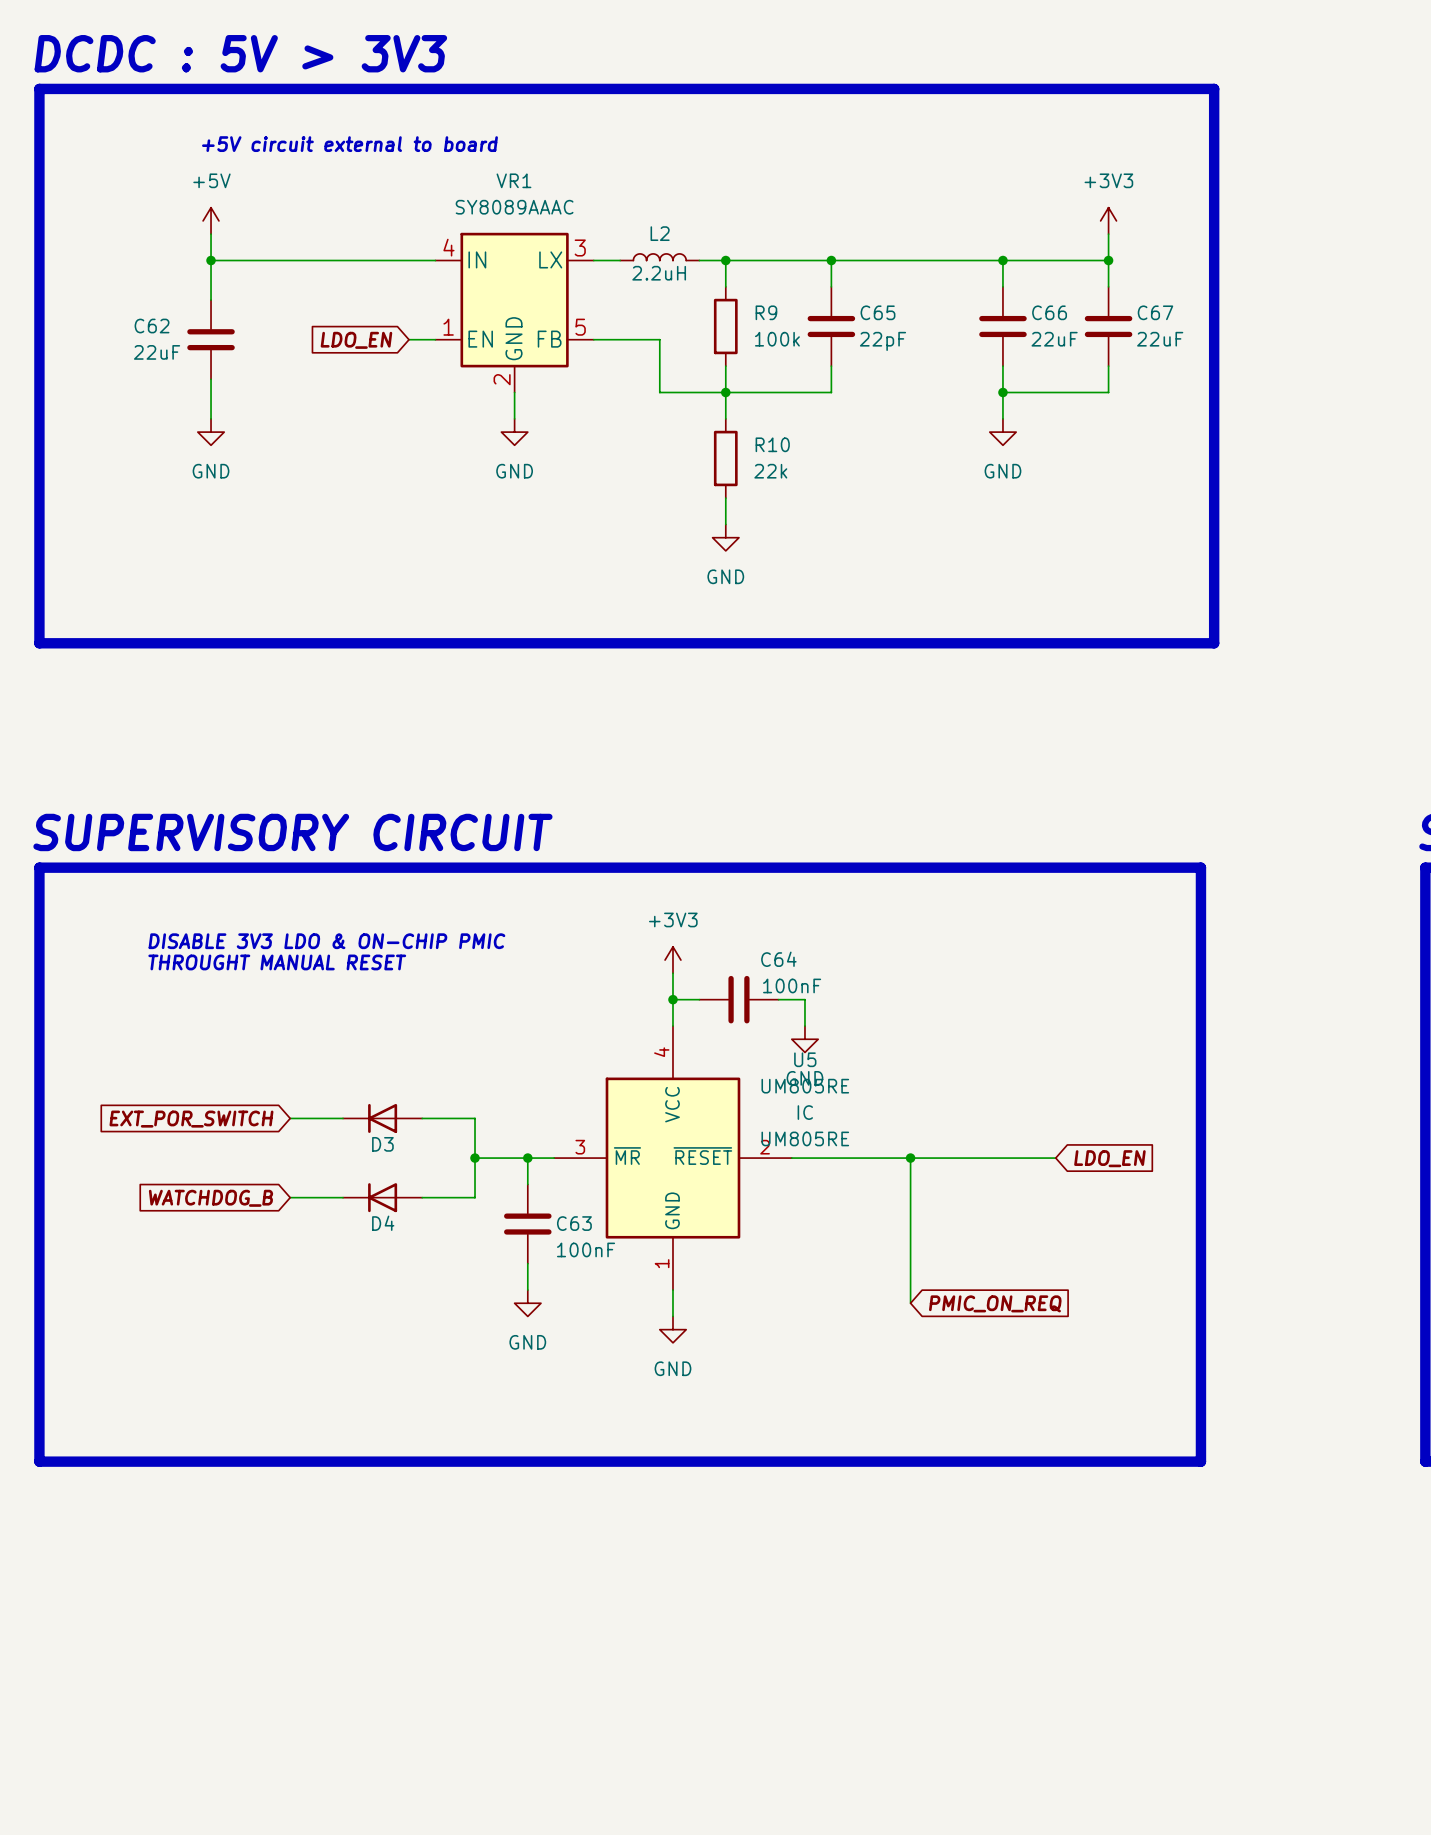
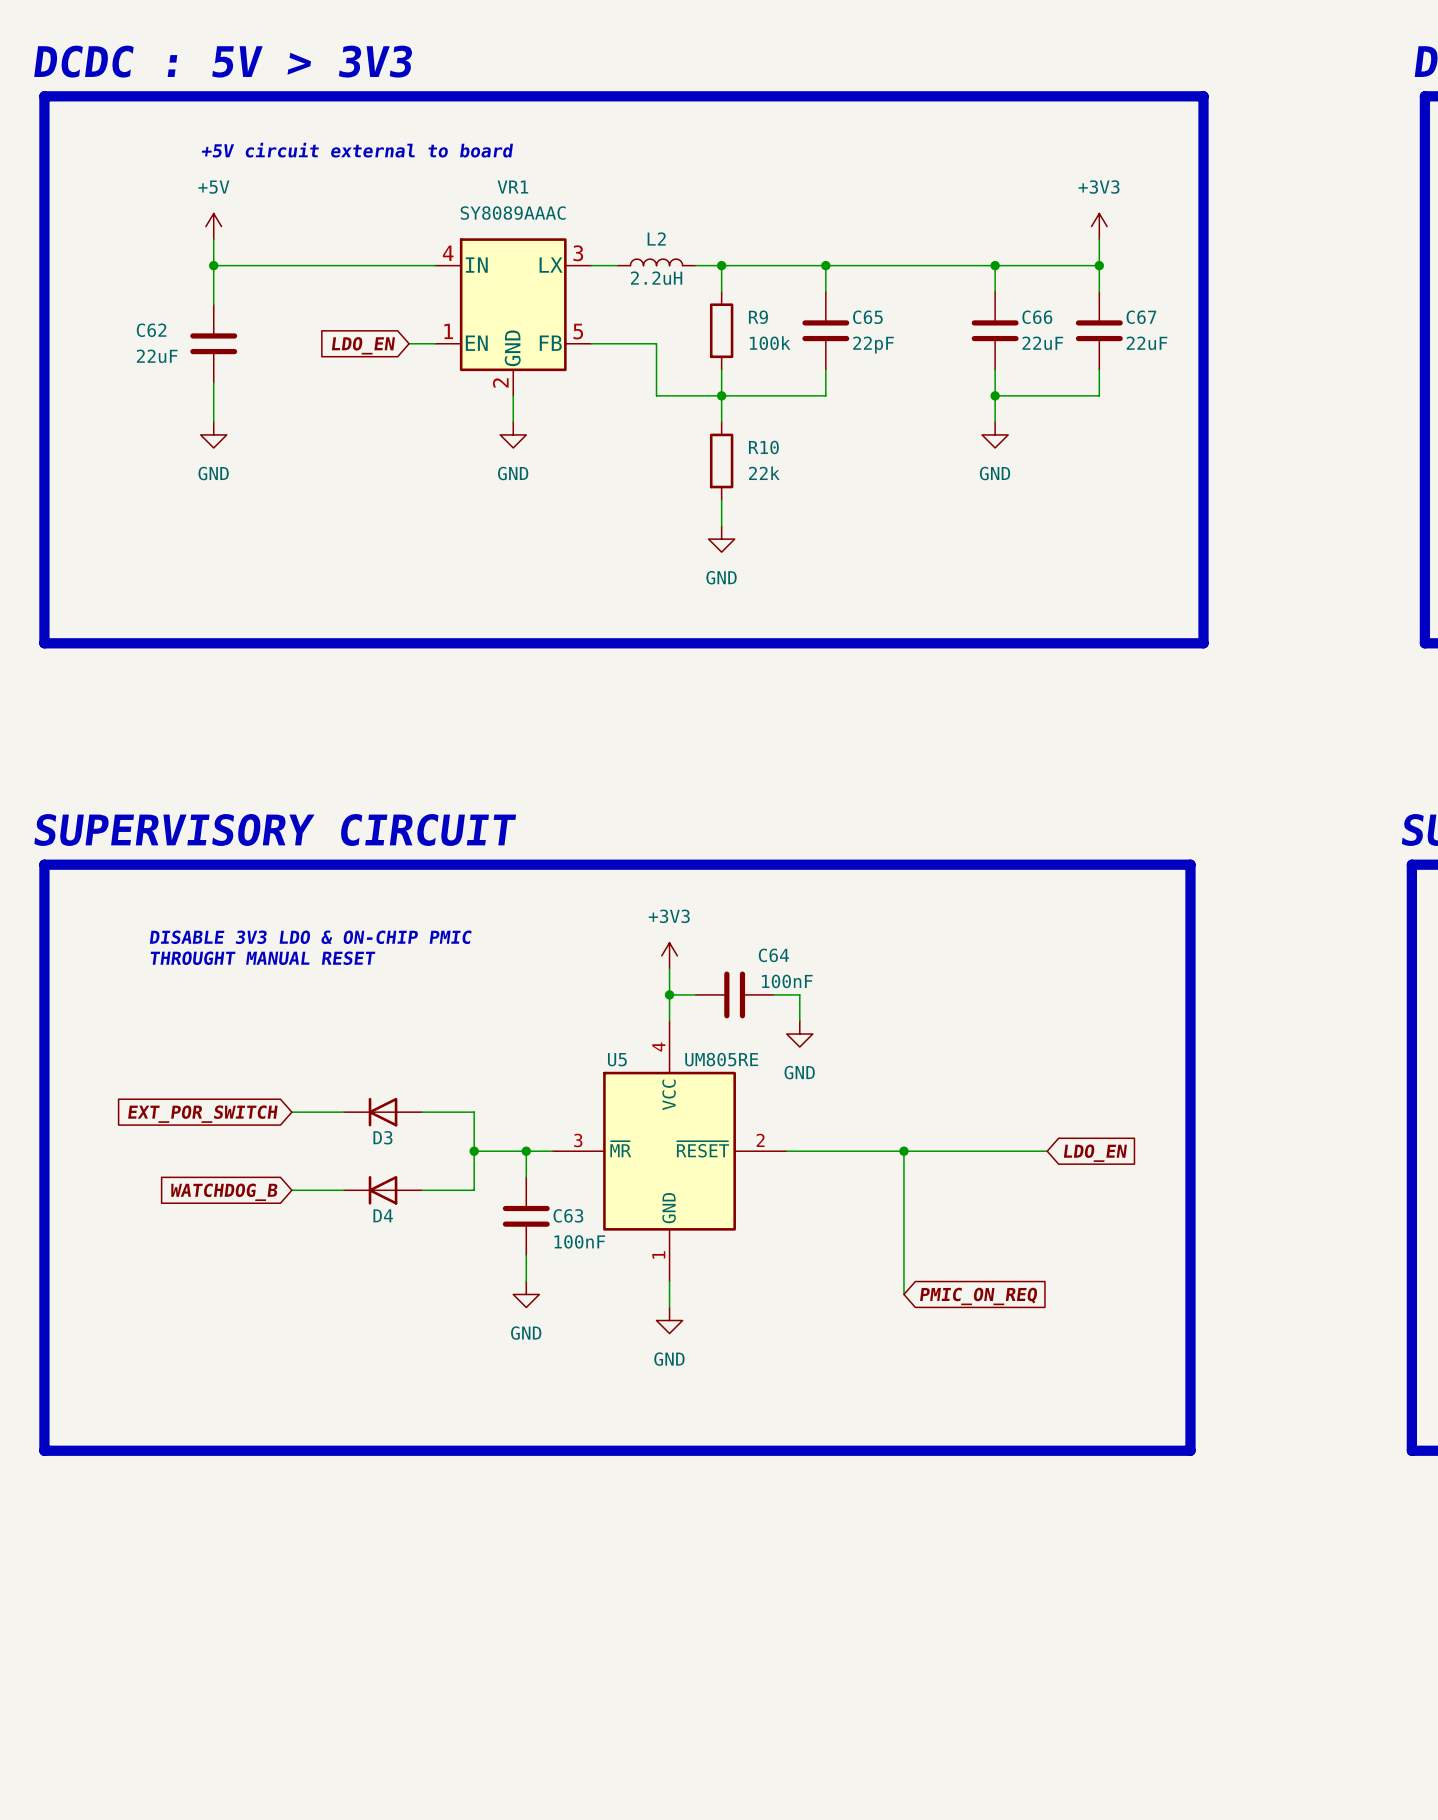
U5 name position: U5 (805, 1059) -> U5 (617, 1059)
U5 value position: UM805RE (805, 1086) -> UM805RE (721, 1059)
U5 text: IC (805, 1112) -> none
U5 text: UM805RE (805, 1138) -> none

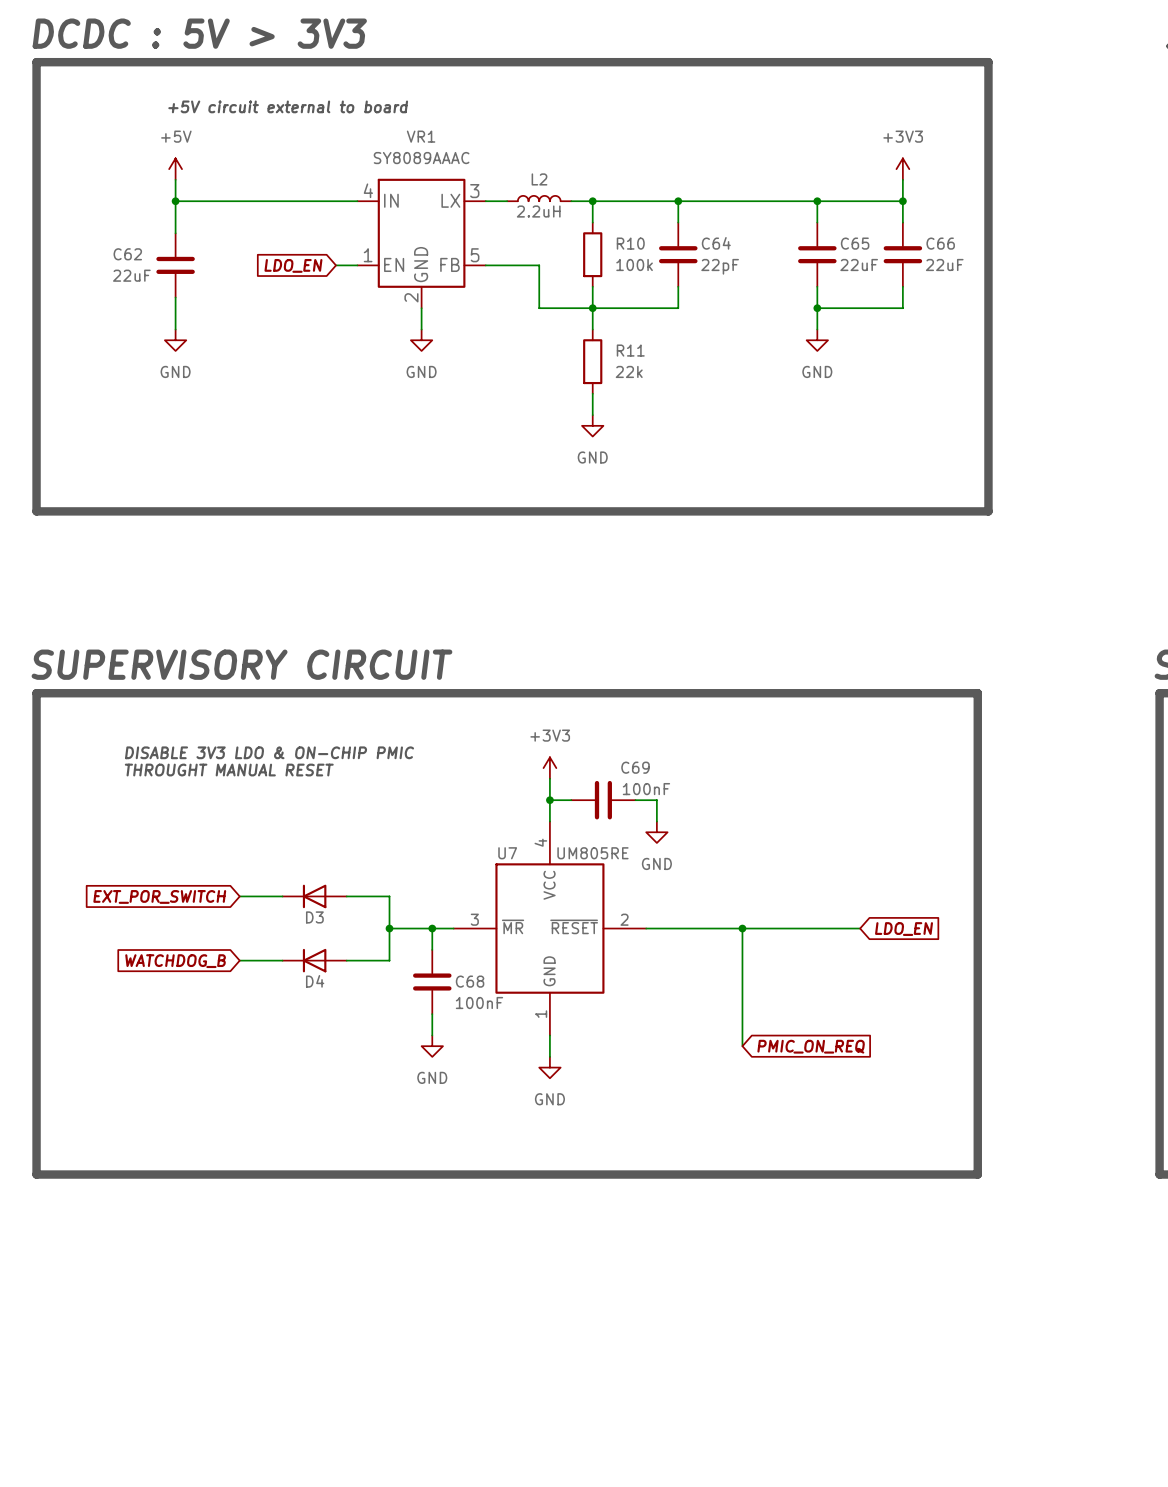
R9 name: R9 (758, 317) -> R10 (630, 243)
C65 name: C65 (867, 317) -> C64 (716, 243)
C66 name: C66 (1037, 317) -> C65 (855, 243)
C67 name: C67 (1141, 317) -> C66 (940, 243)
R10 name: R10 (763, 447) -> R11 (630, 350)
C64 name: C64 (773, 955) -> C69 (635, 767)
U5 name: U5 (617, 1059) -> U7 (507, 853)
C63 name: C63 (568, 1215) -> C68 (470, 981)

